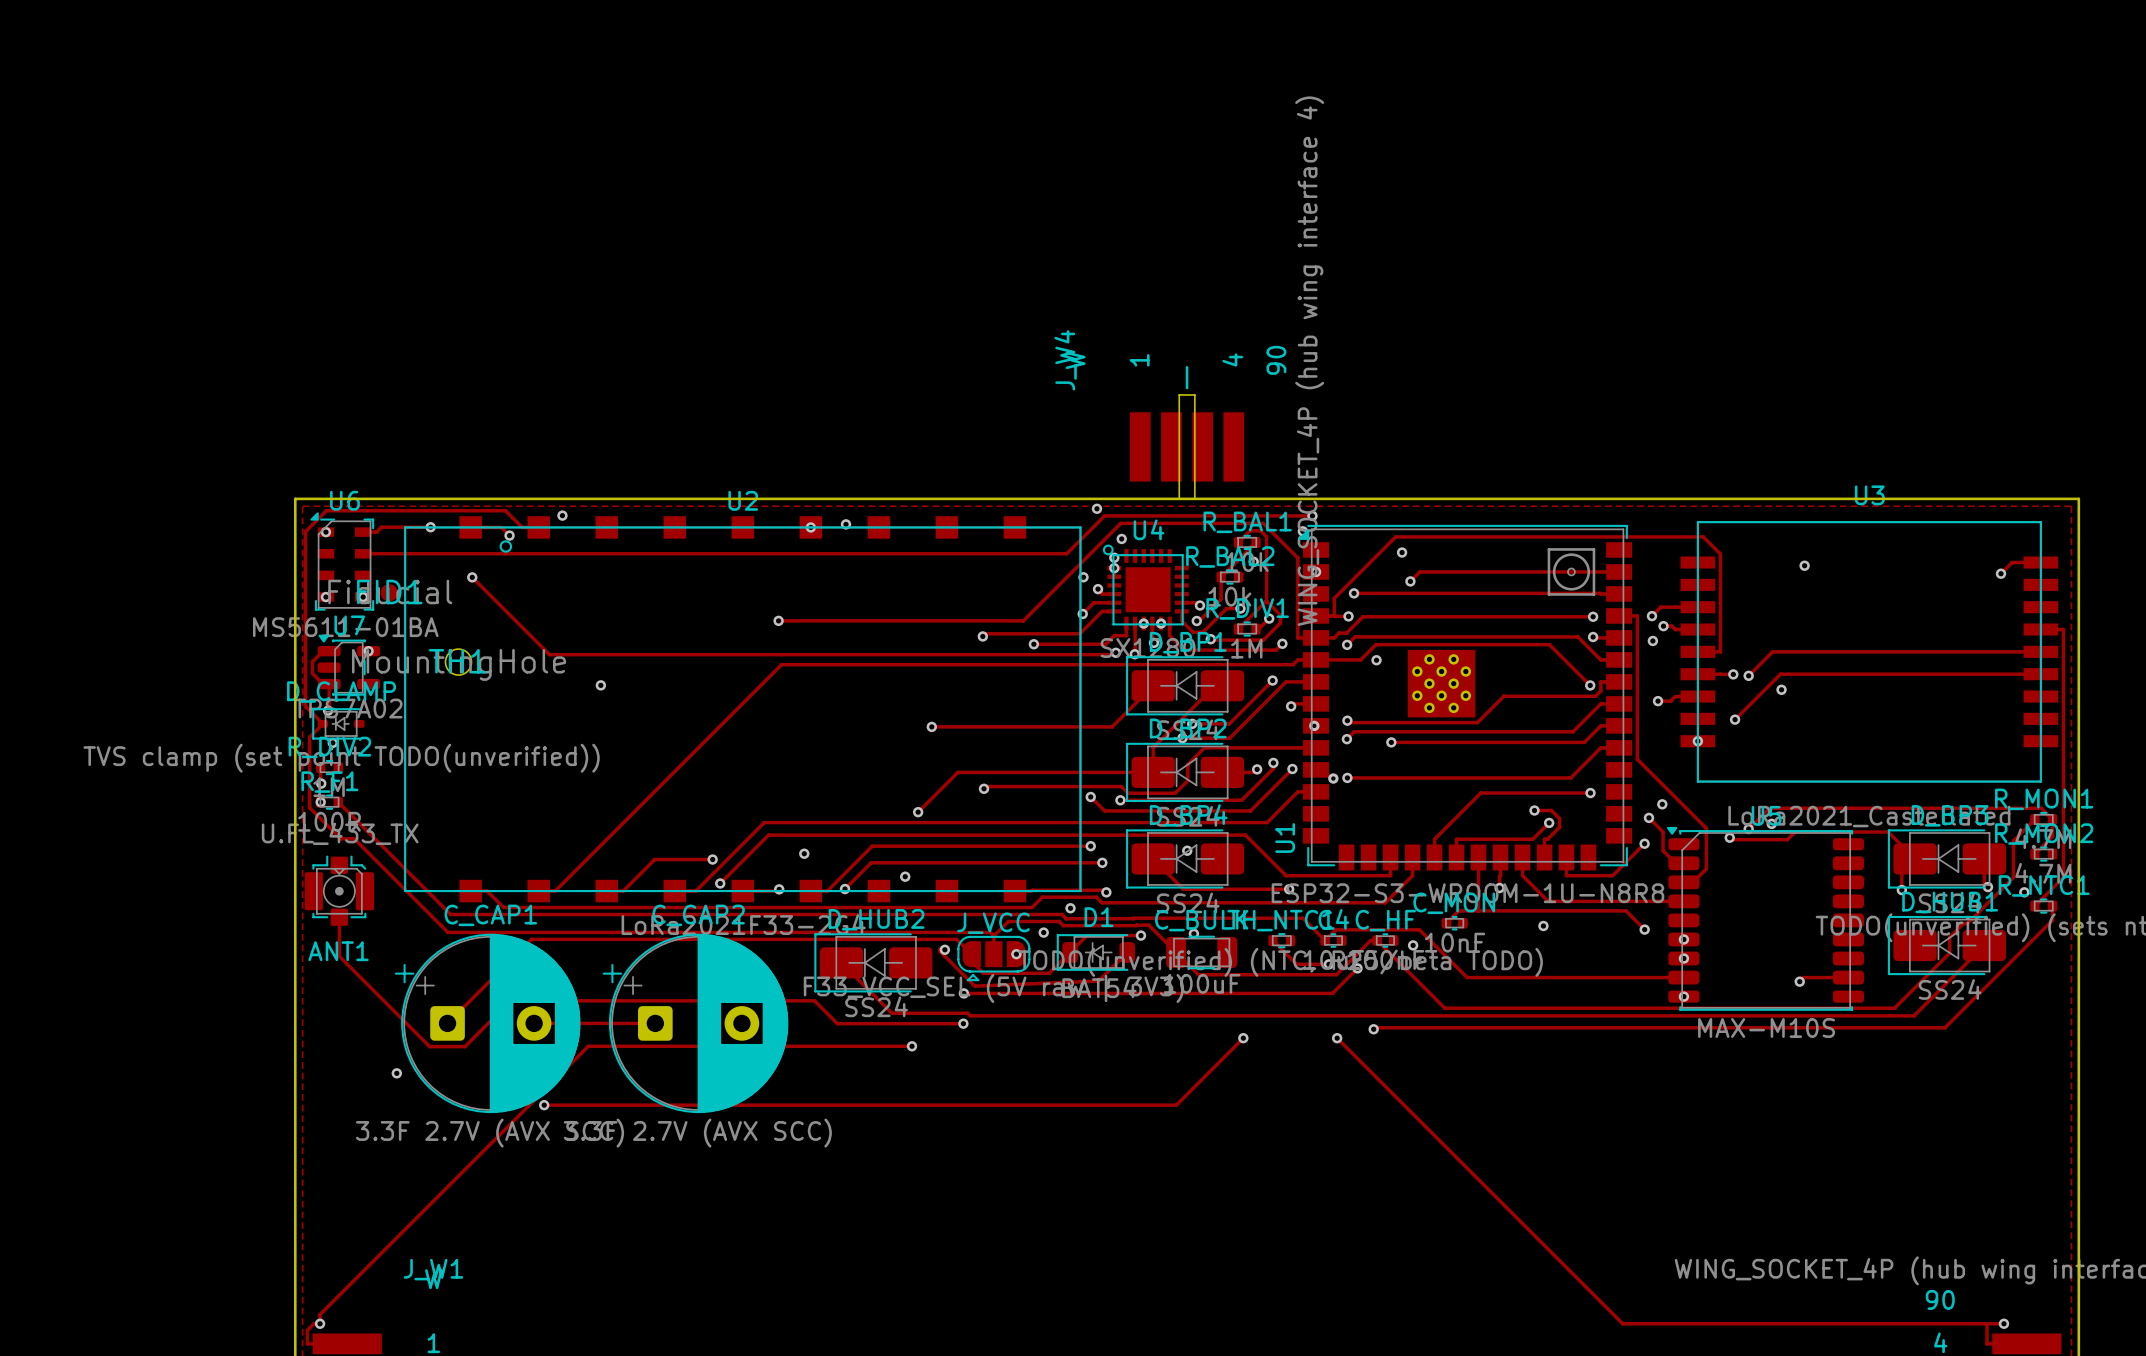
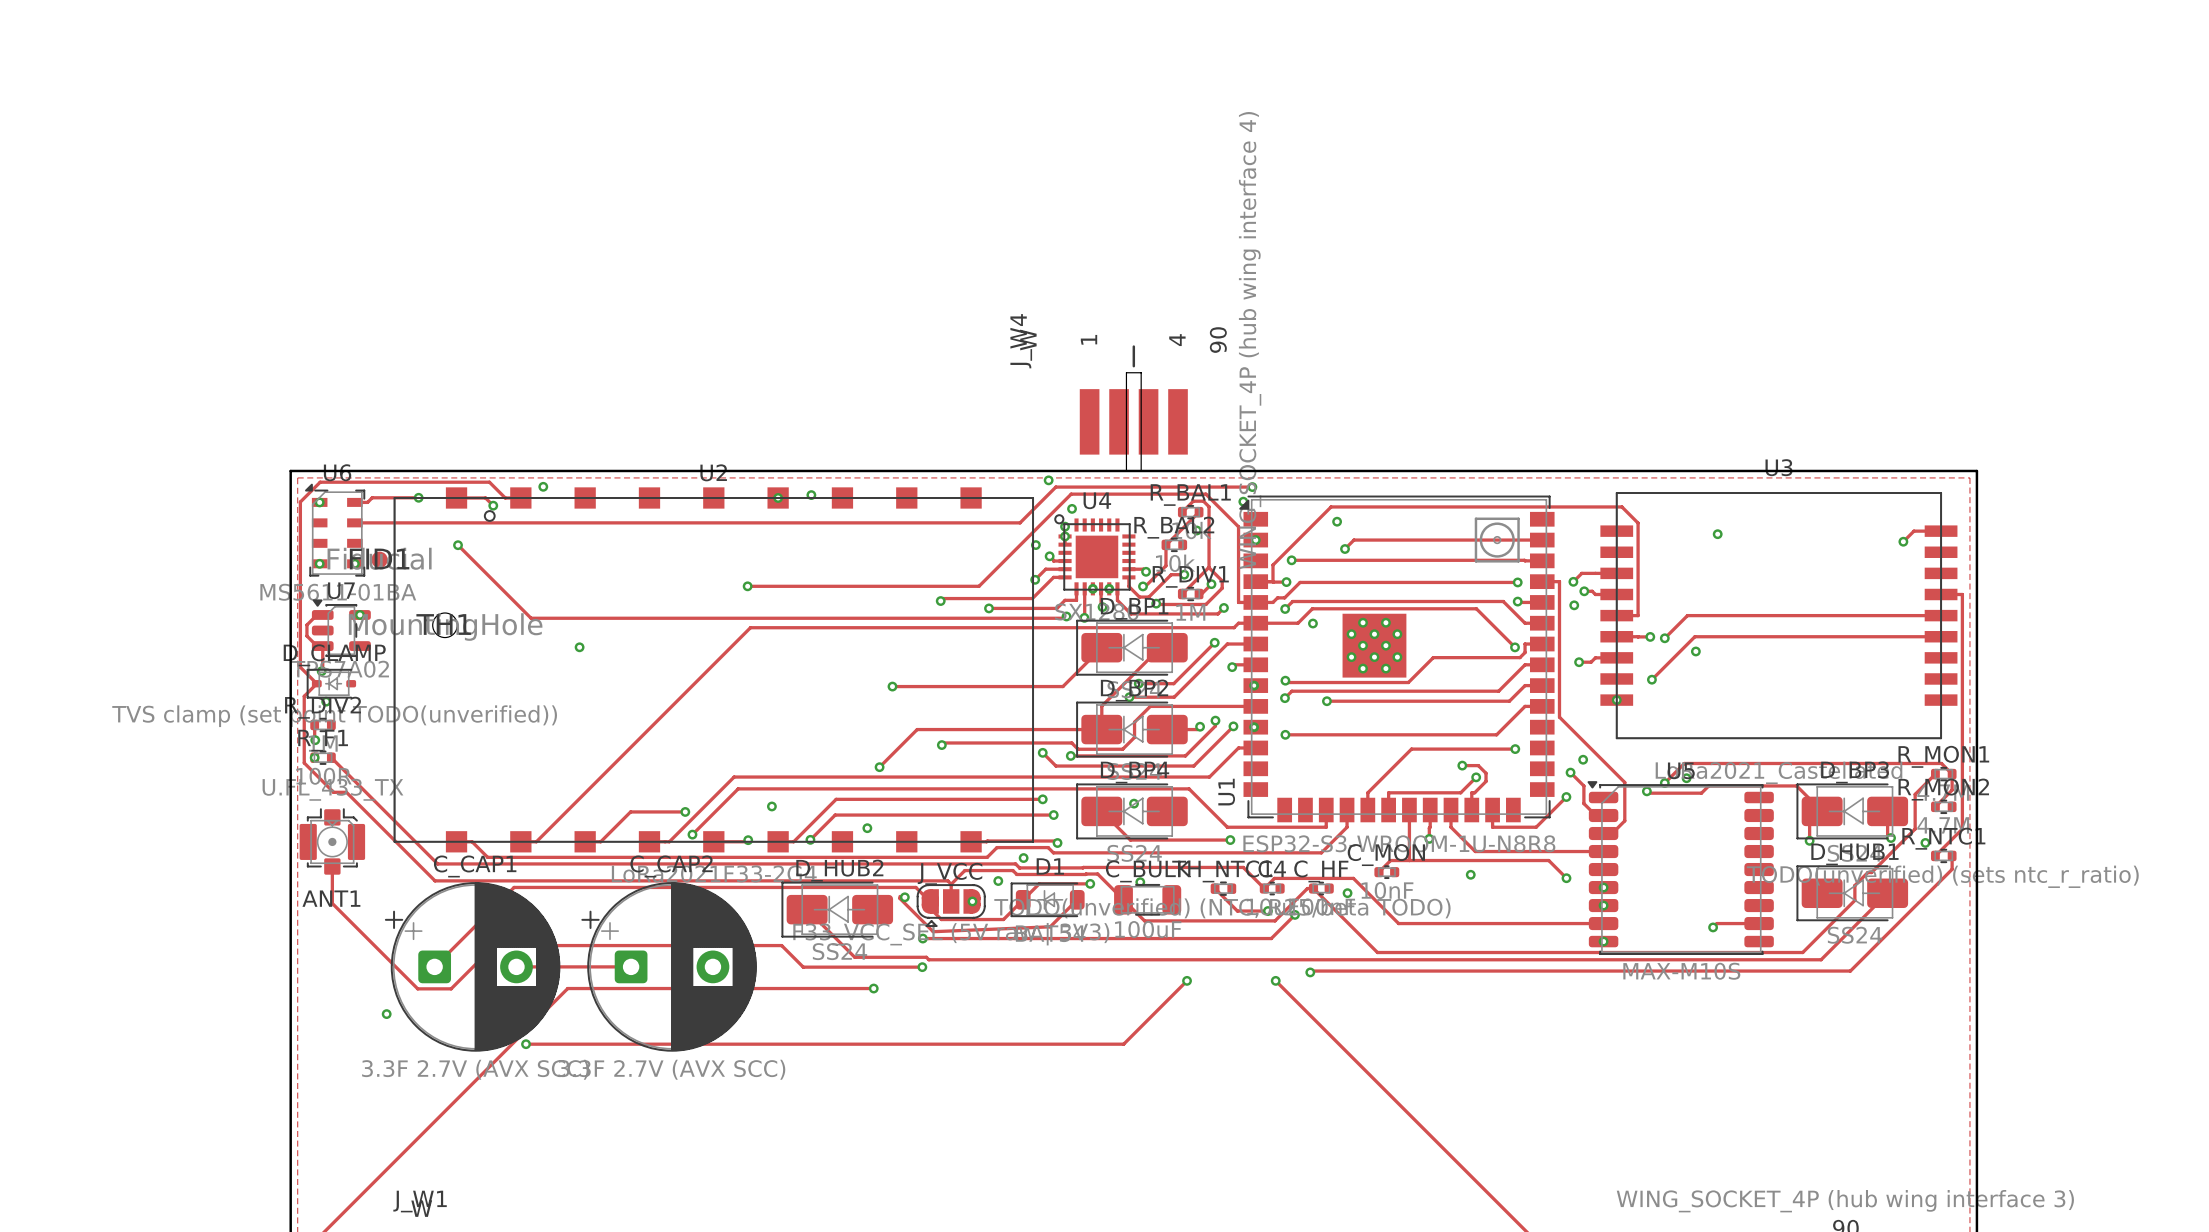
via position: (1333, 778) -> (1254, 727)

